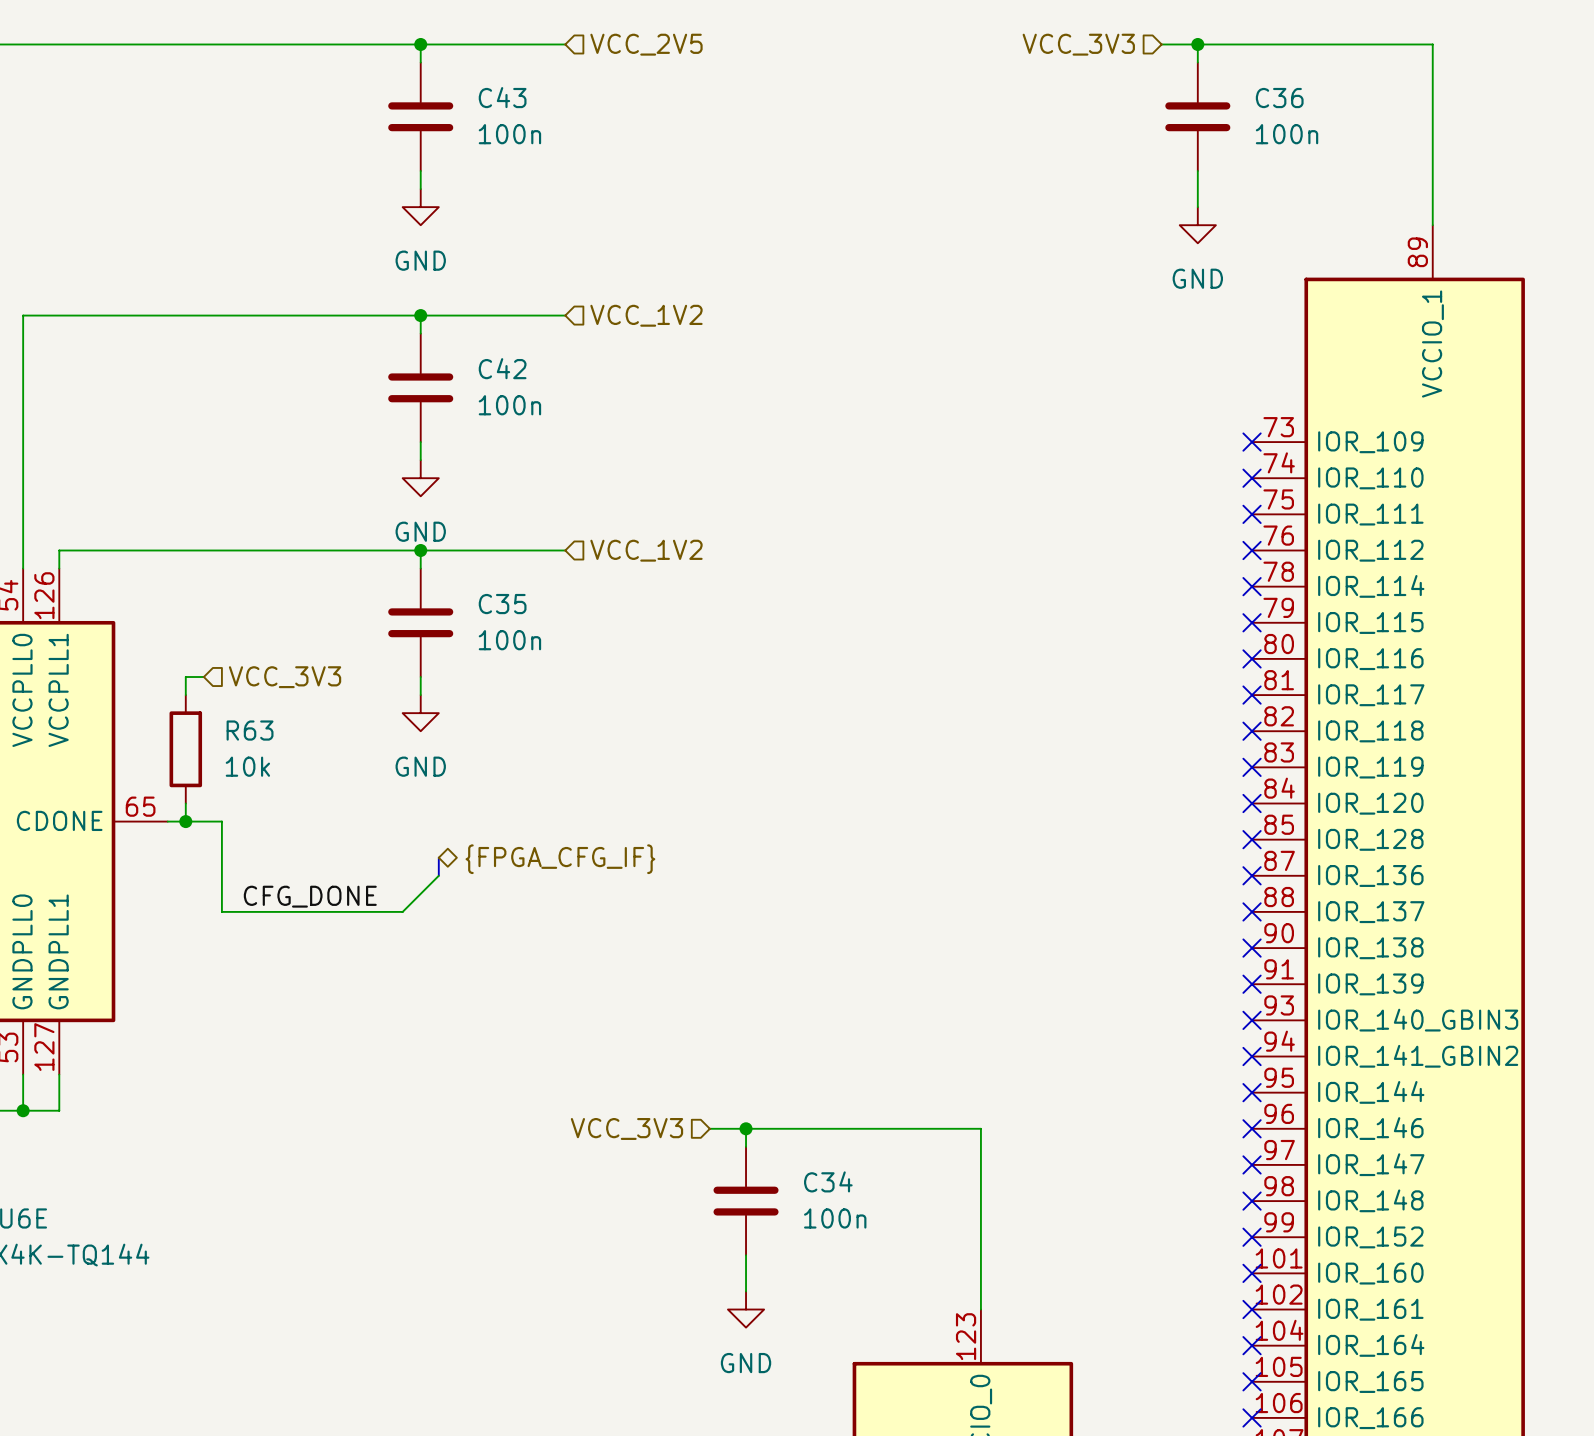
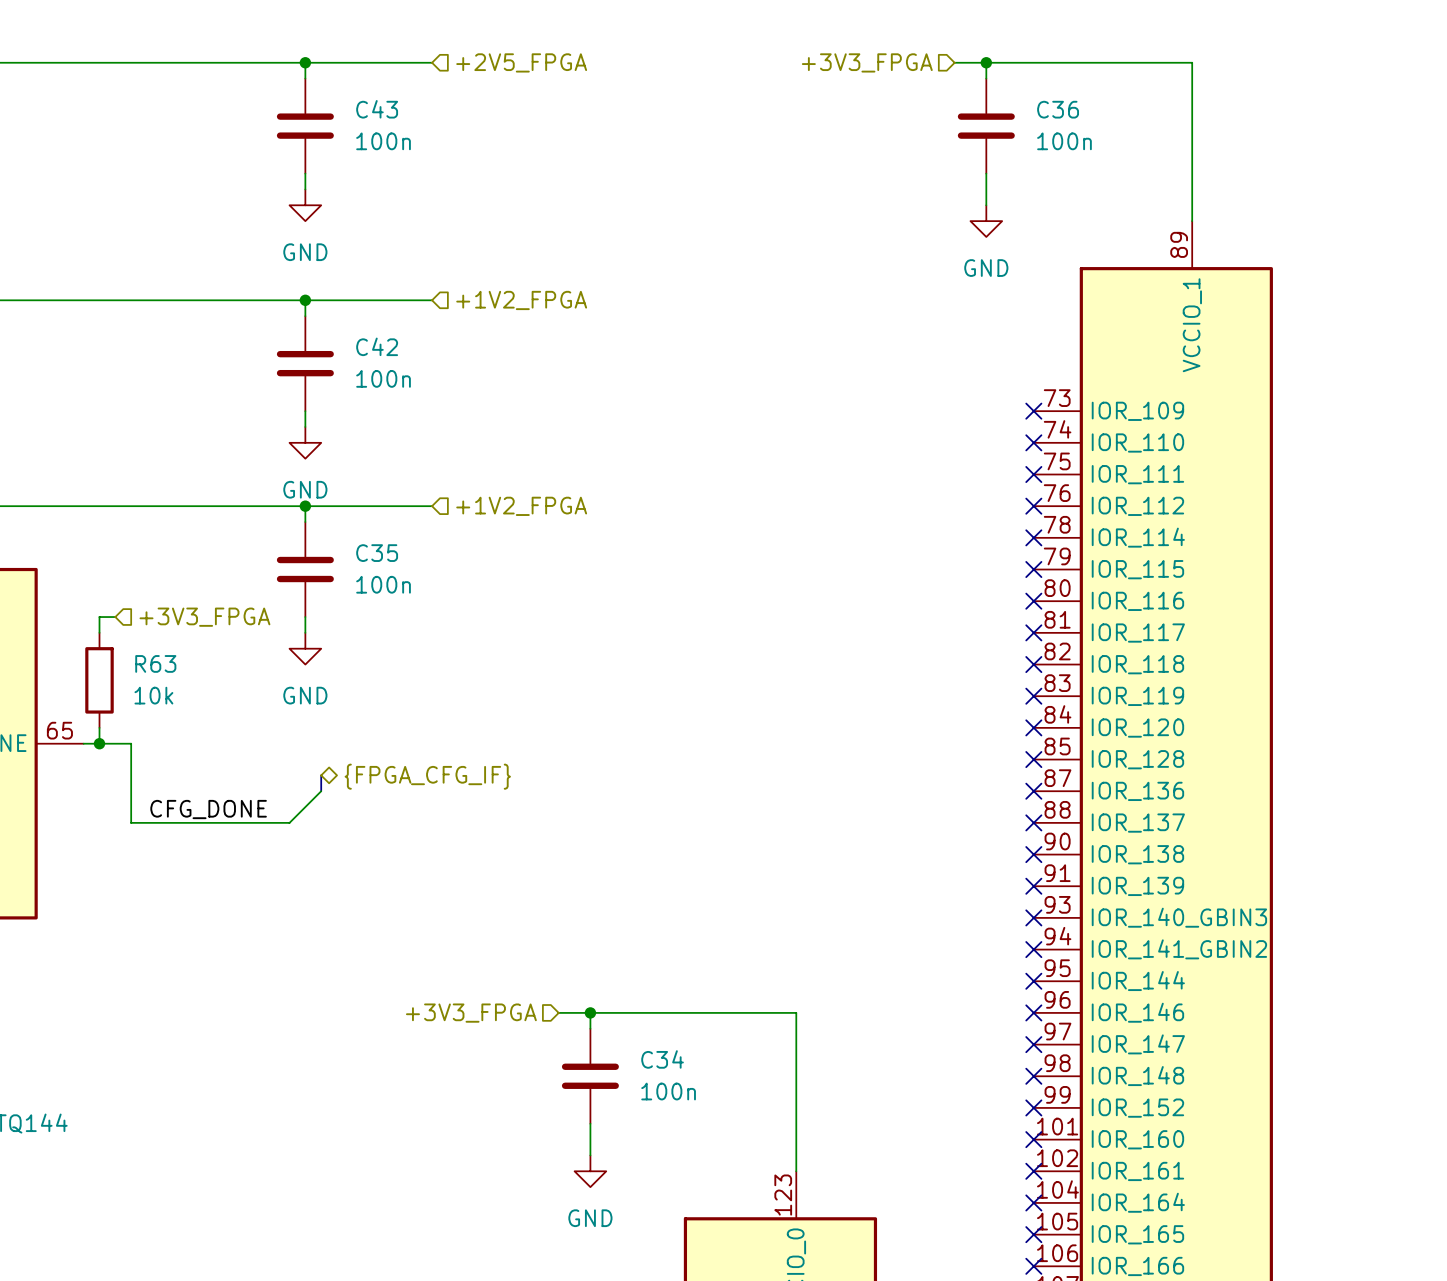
hierarchical label: VCC_2V5 (646, 44) -> +2V5_FPGA (521, 62)
hierarchical label: VCC_3V3 (1078, 44) -> +3V3_FPGA (867, 62)
hierarchical label: VCC_1V2 (646, 315) -> +1V2_FPGA (521, 300)
hierarchical label: VCC_1V2 (646, 550) -> +1V2_FPGA (521, 506)
hierarchical label: VCC_3V3 (285, 677) -> +3V3_FPGA (204, 617)
hierarchical label: VCC_3V3 (626, 1128) -> +3V3_FPGA (471, 1013)

